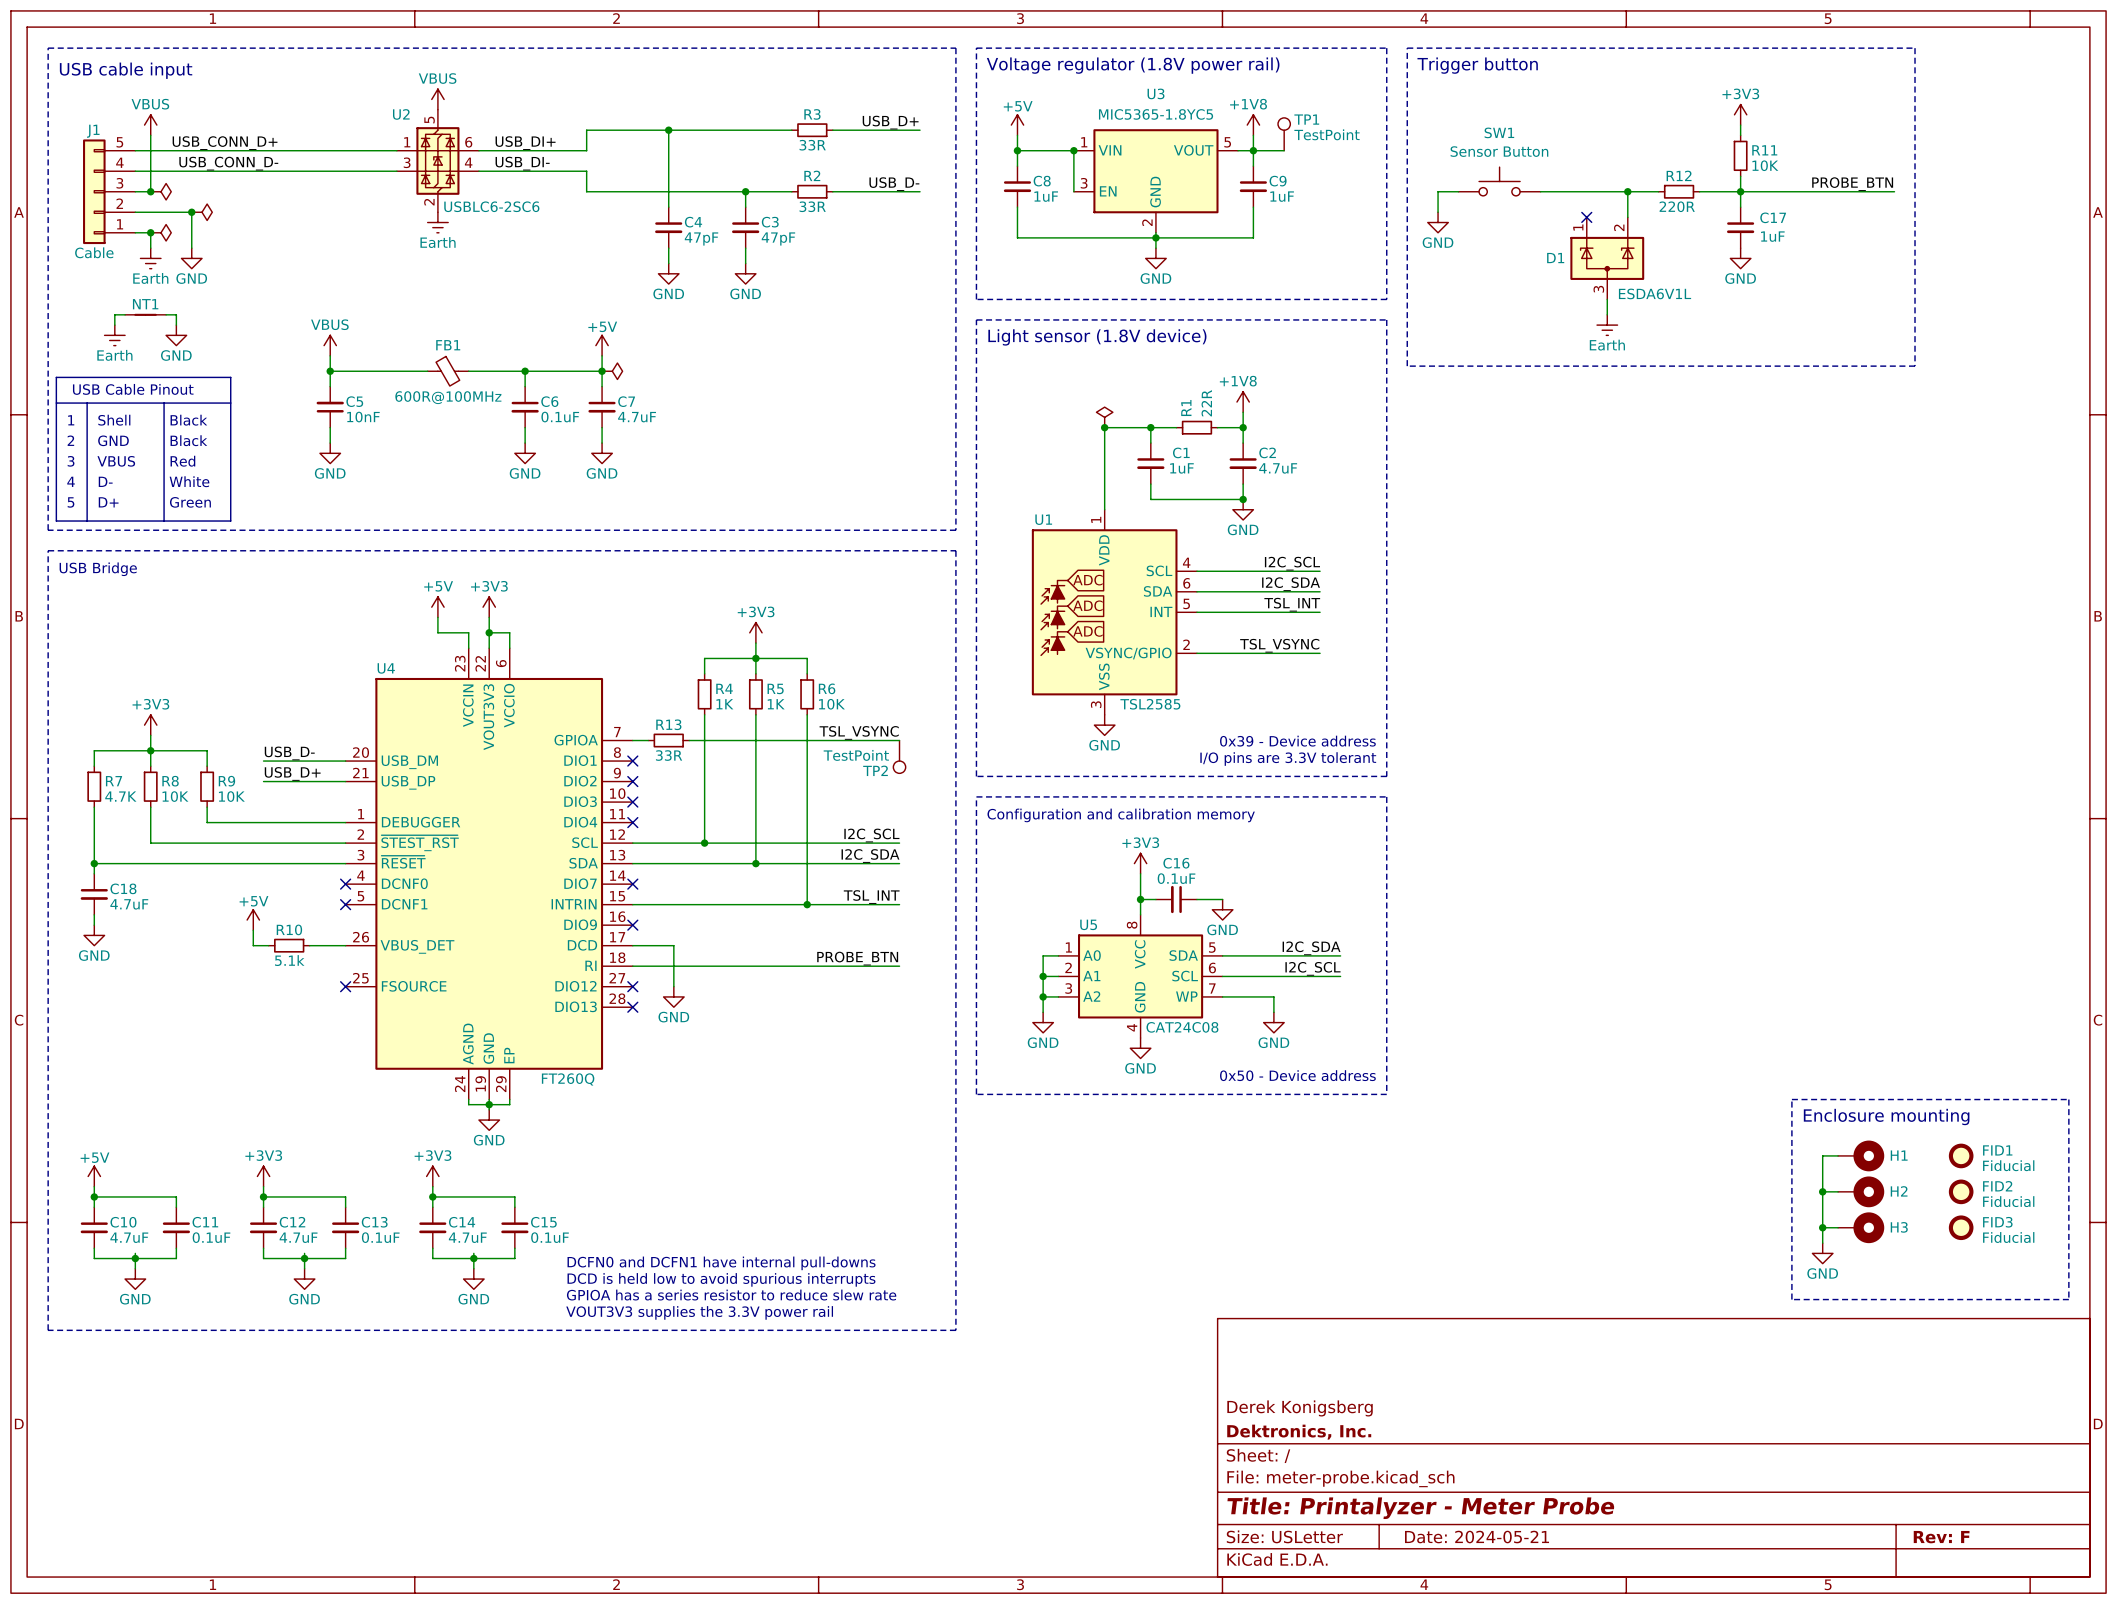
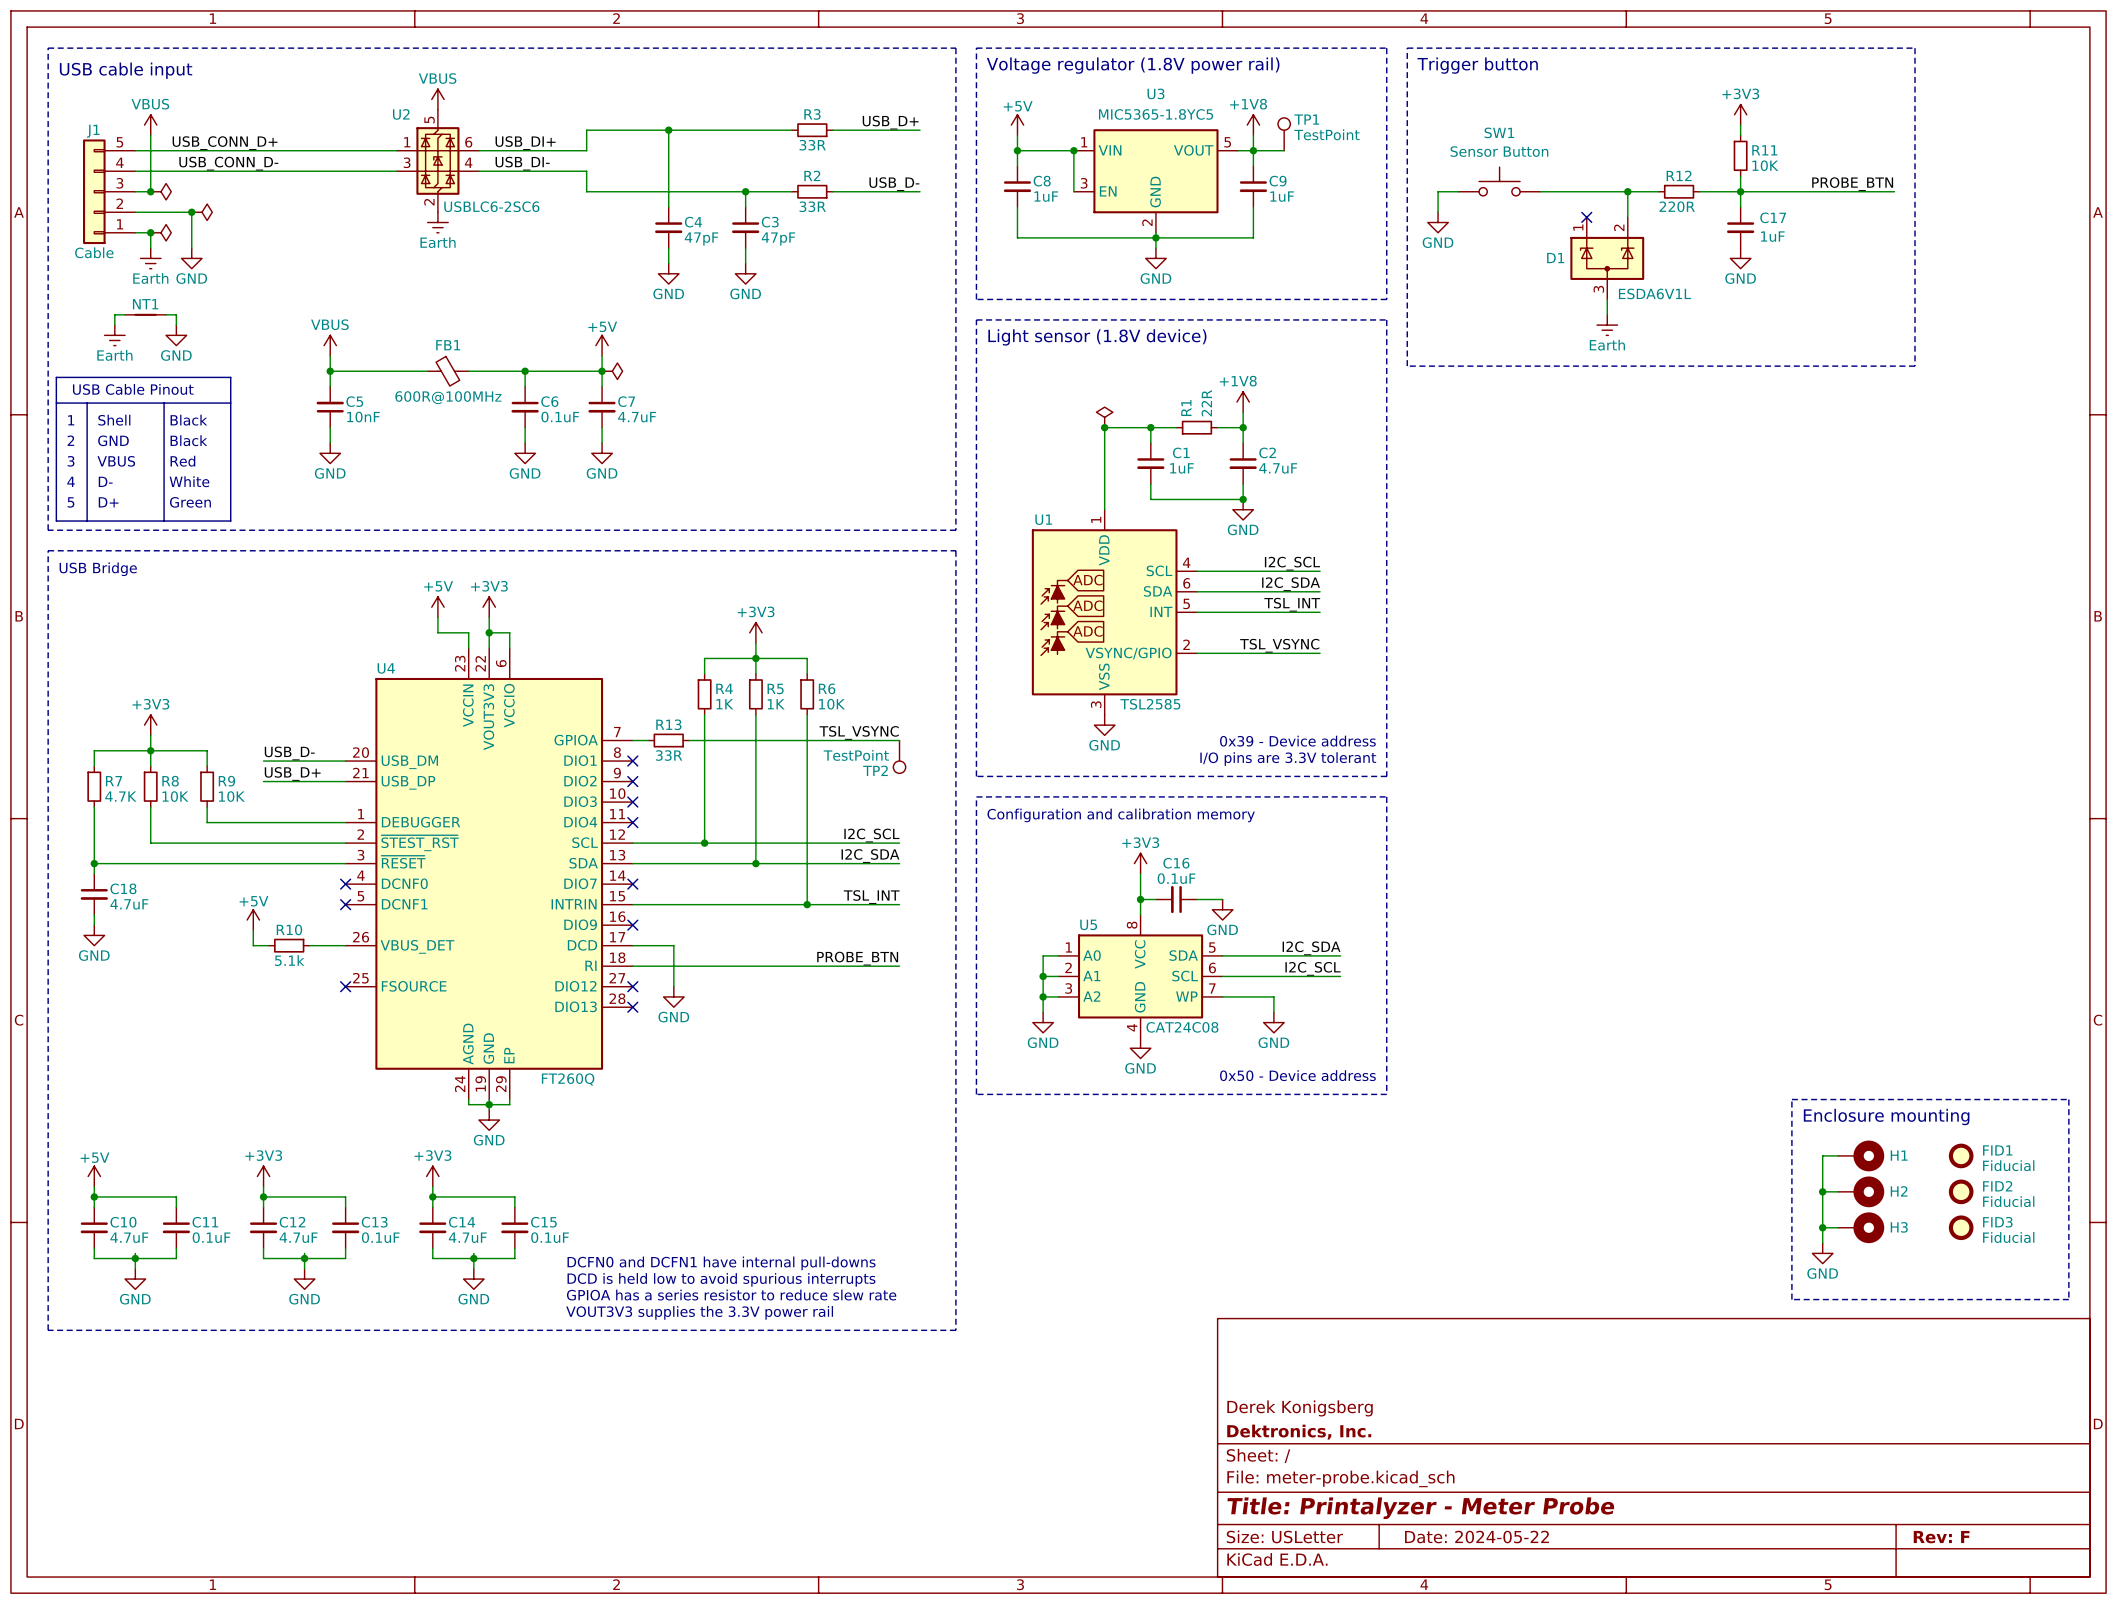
title block: Date: 2024-05-21 (1477, 1537) -> Date: 2024-05-22 (1476, 1537)

